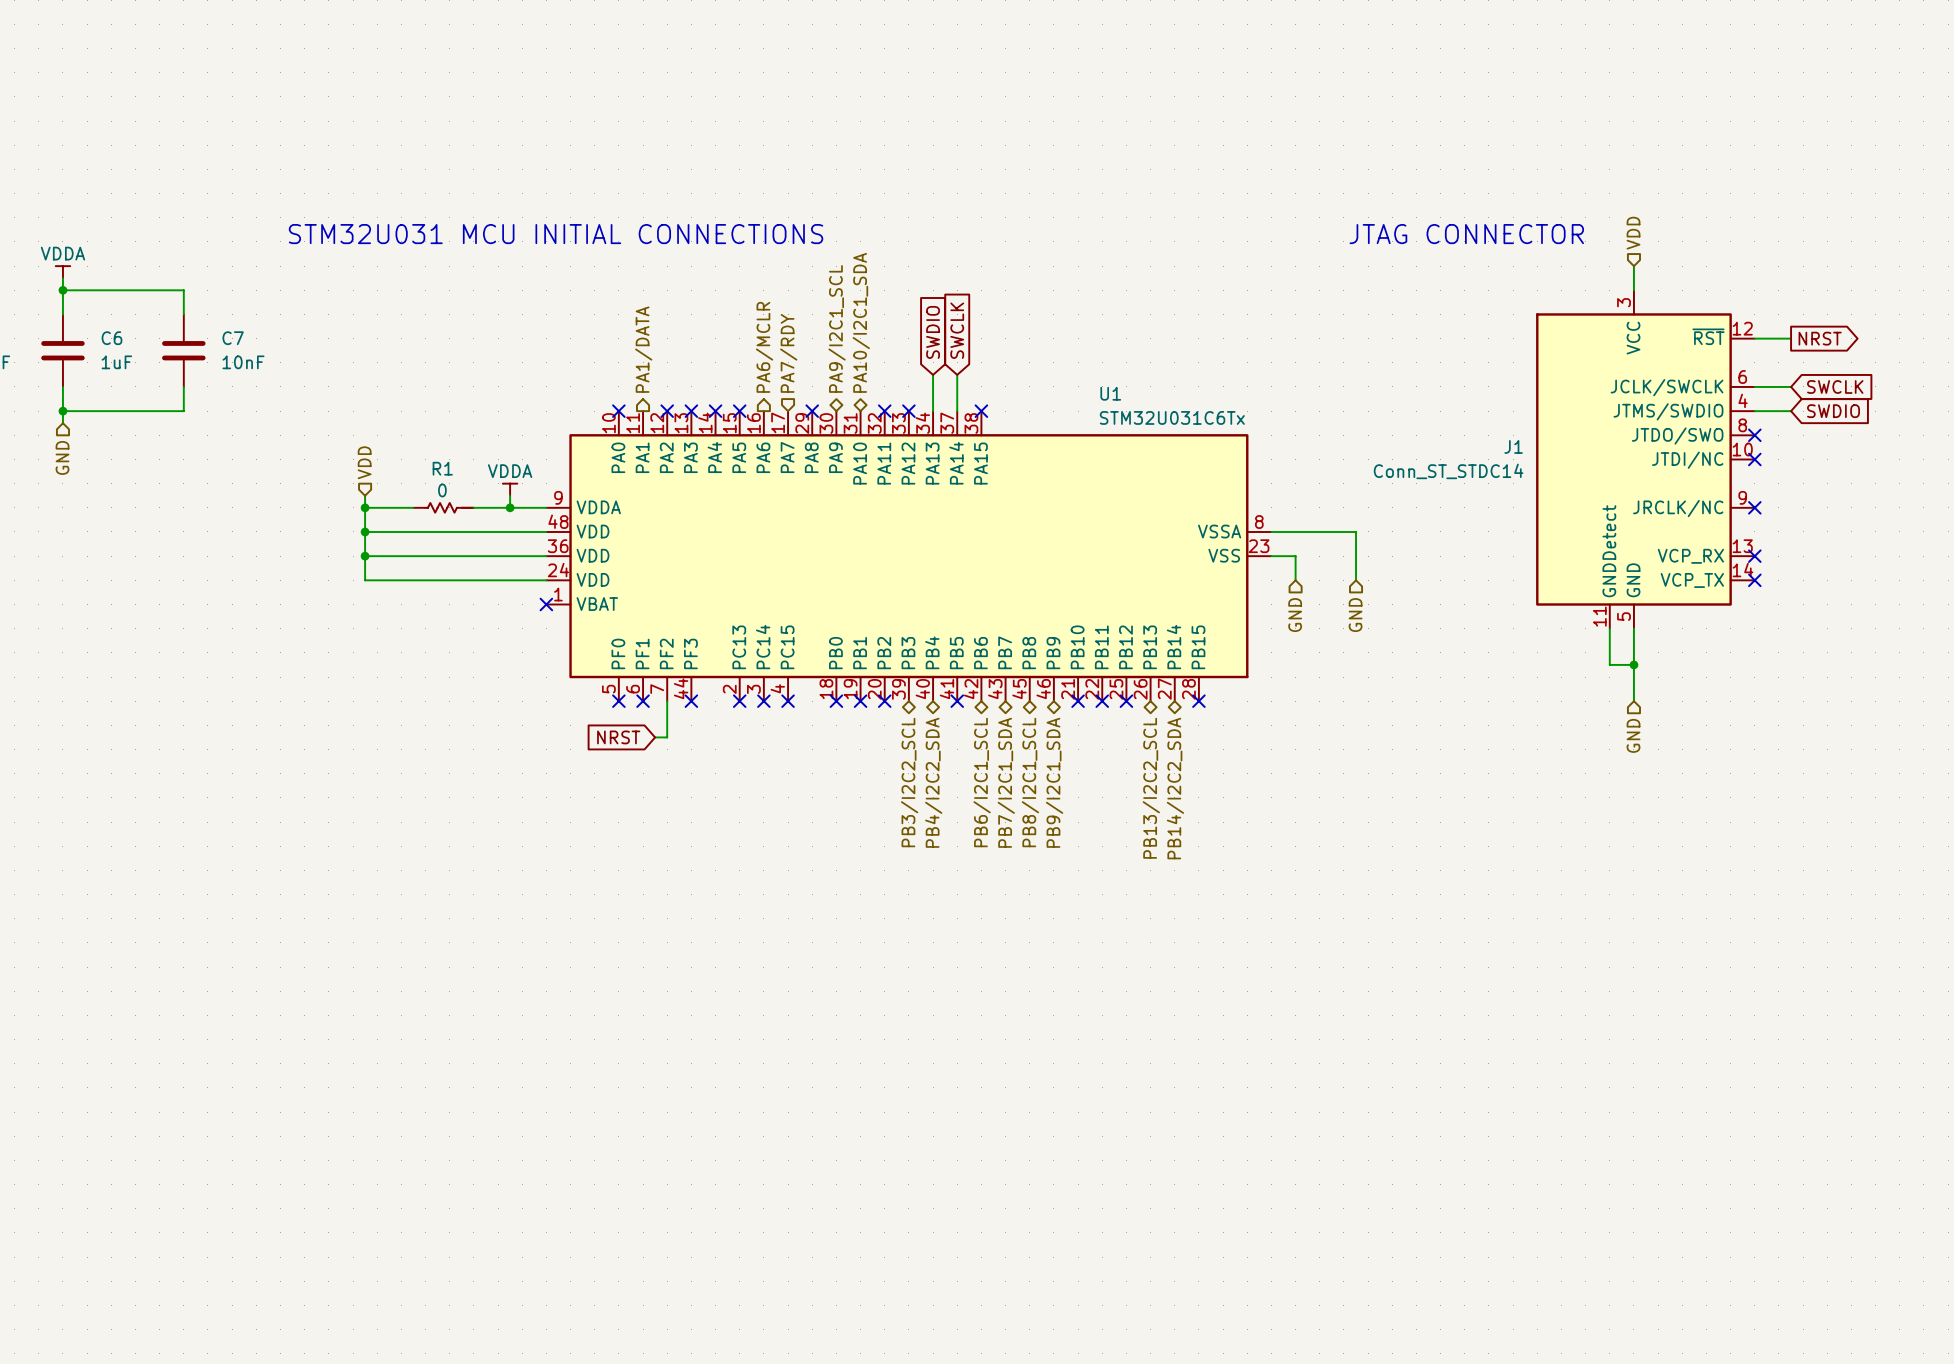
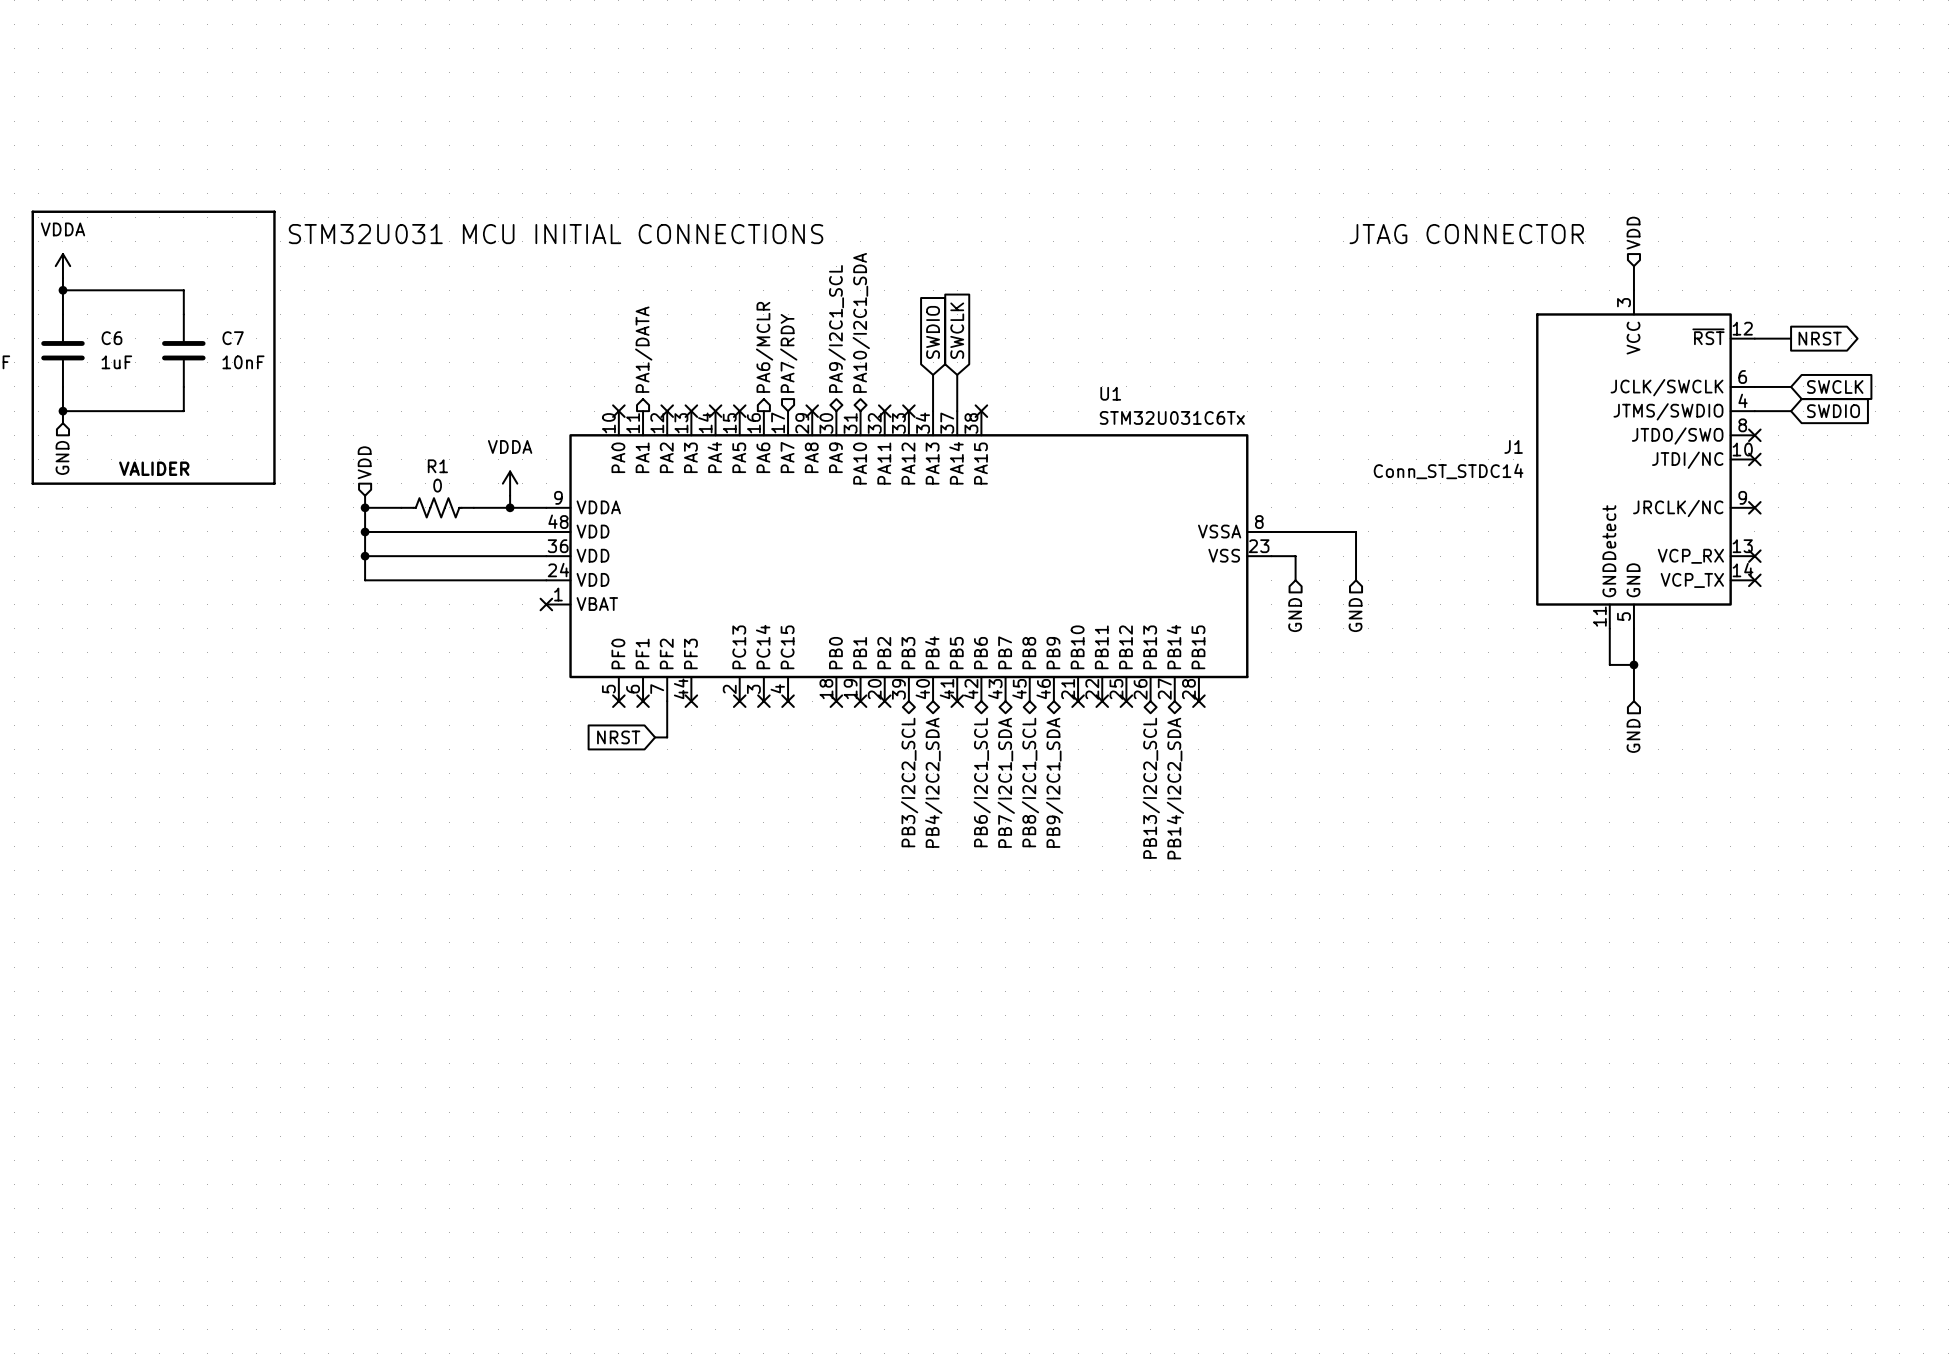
line: none -> (32, 211) (274, 211) (274, 483) (32, 483) (32, 211)
power symbol shape: [55, 266, 71, 279] -> [55, 254, 71, 279]
text: none -> VALIDER (154, 468)
power symbol shape: [502, 483, 518, 496] -> [502, 471, 518, 496]
R1 symbol: [413, 502, 474, 513] -> [401, 498, 474, 518]

